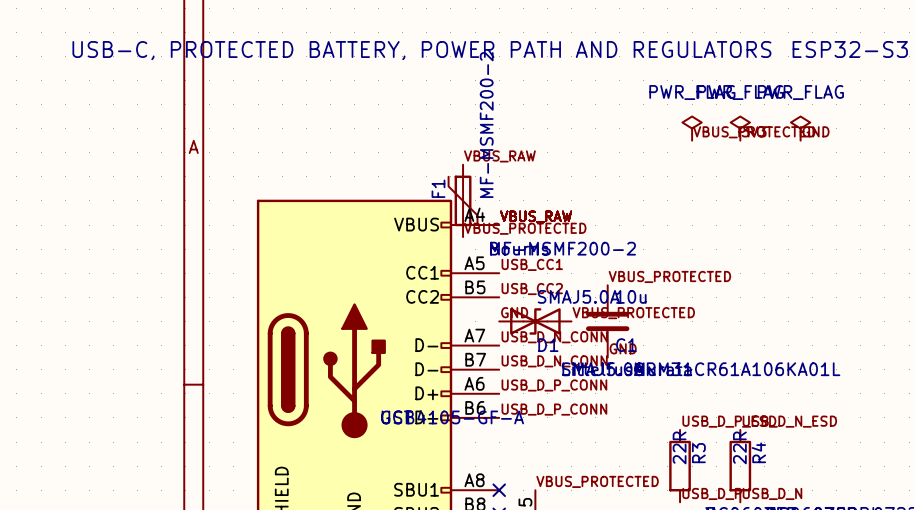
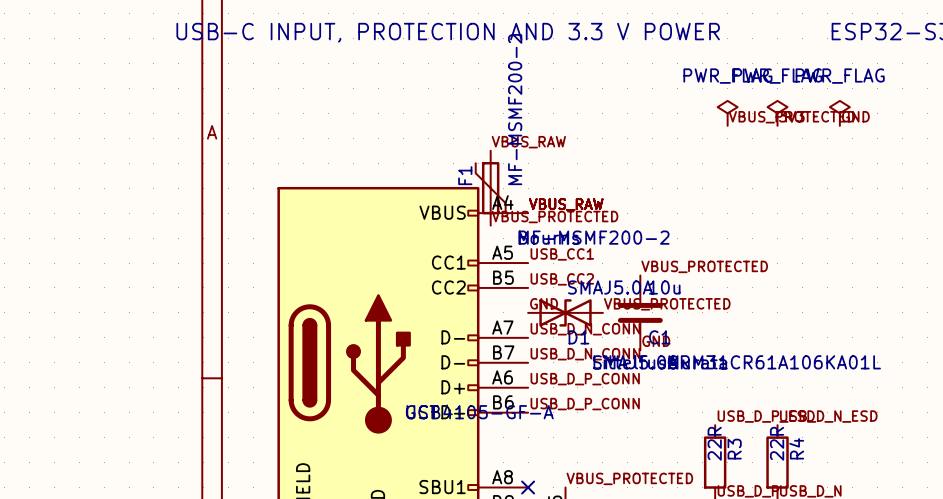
text: USB-C, PROTECTED BATTERY, POWER PATH AND REGULATORS (421, 50) -> USB-C INPUT, PROTECTION AND 3.3 V POWER (448, 32)

